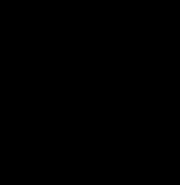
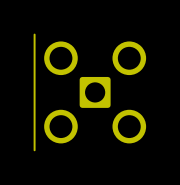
part: none -> (90, 92)

